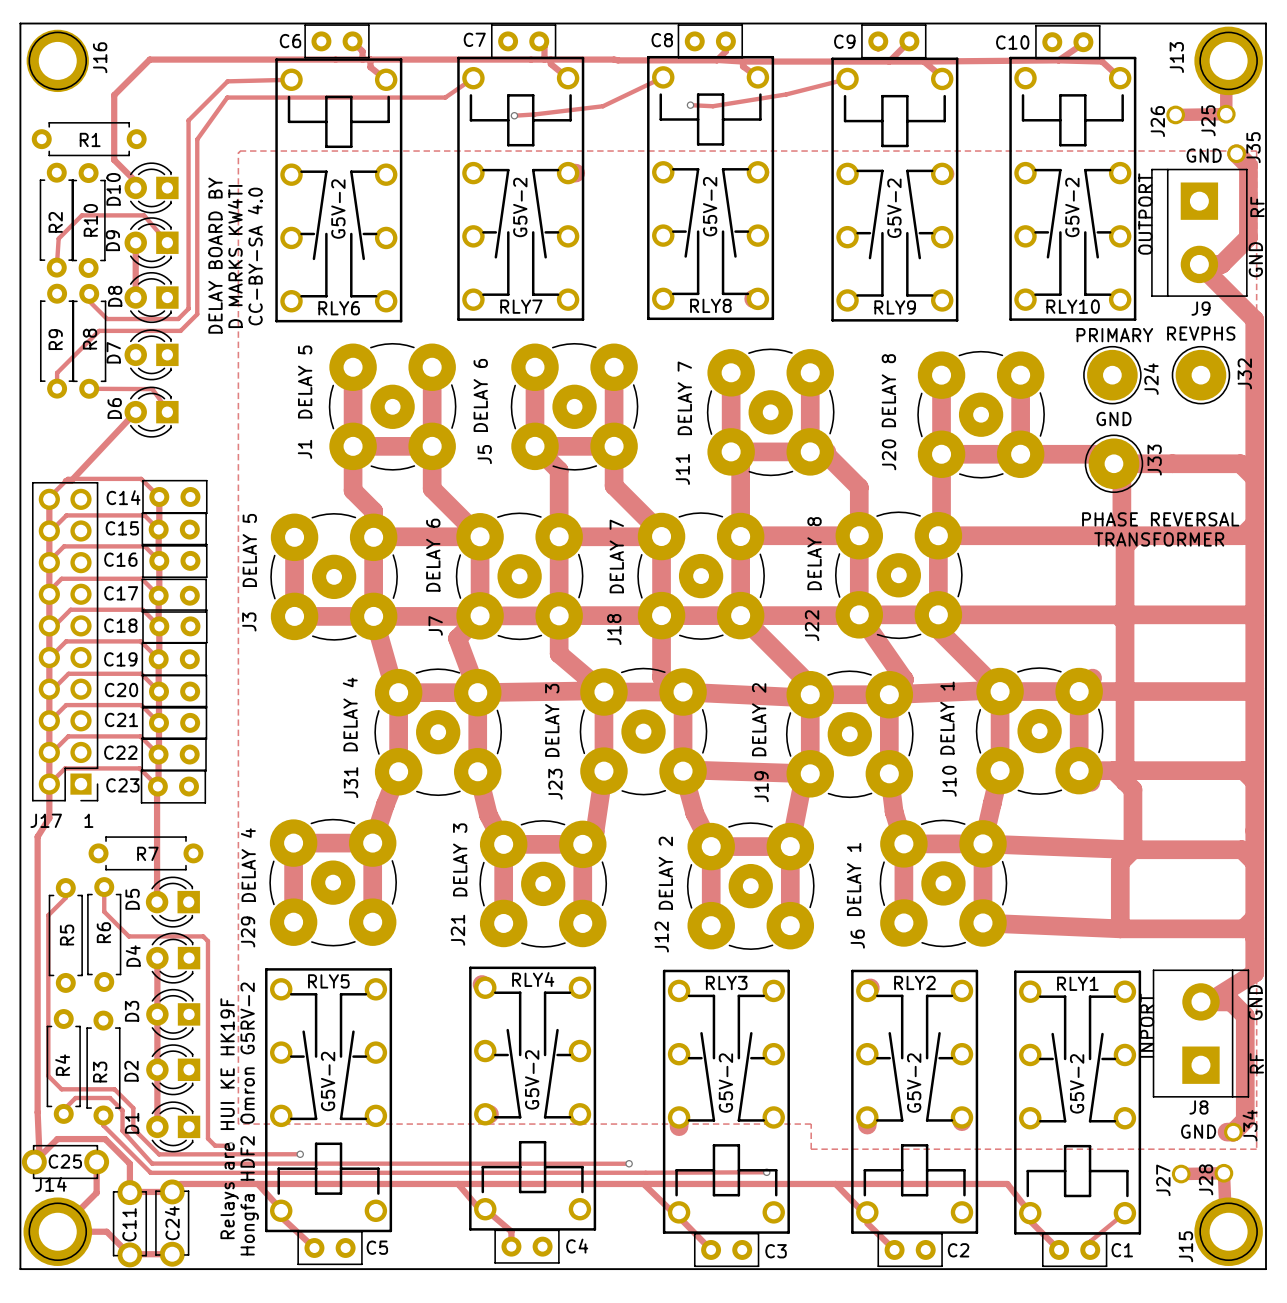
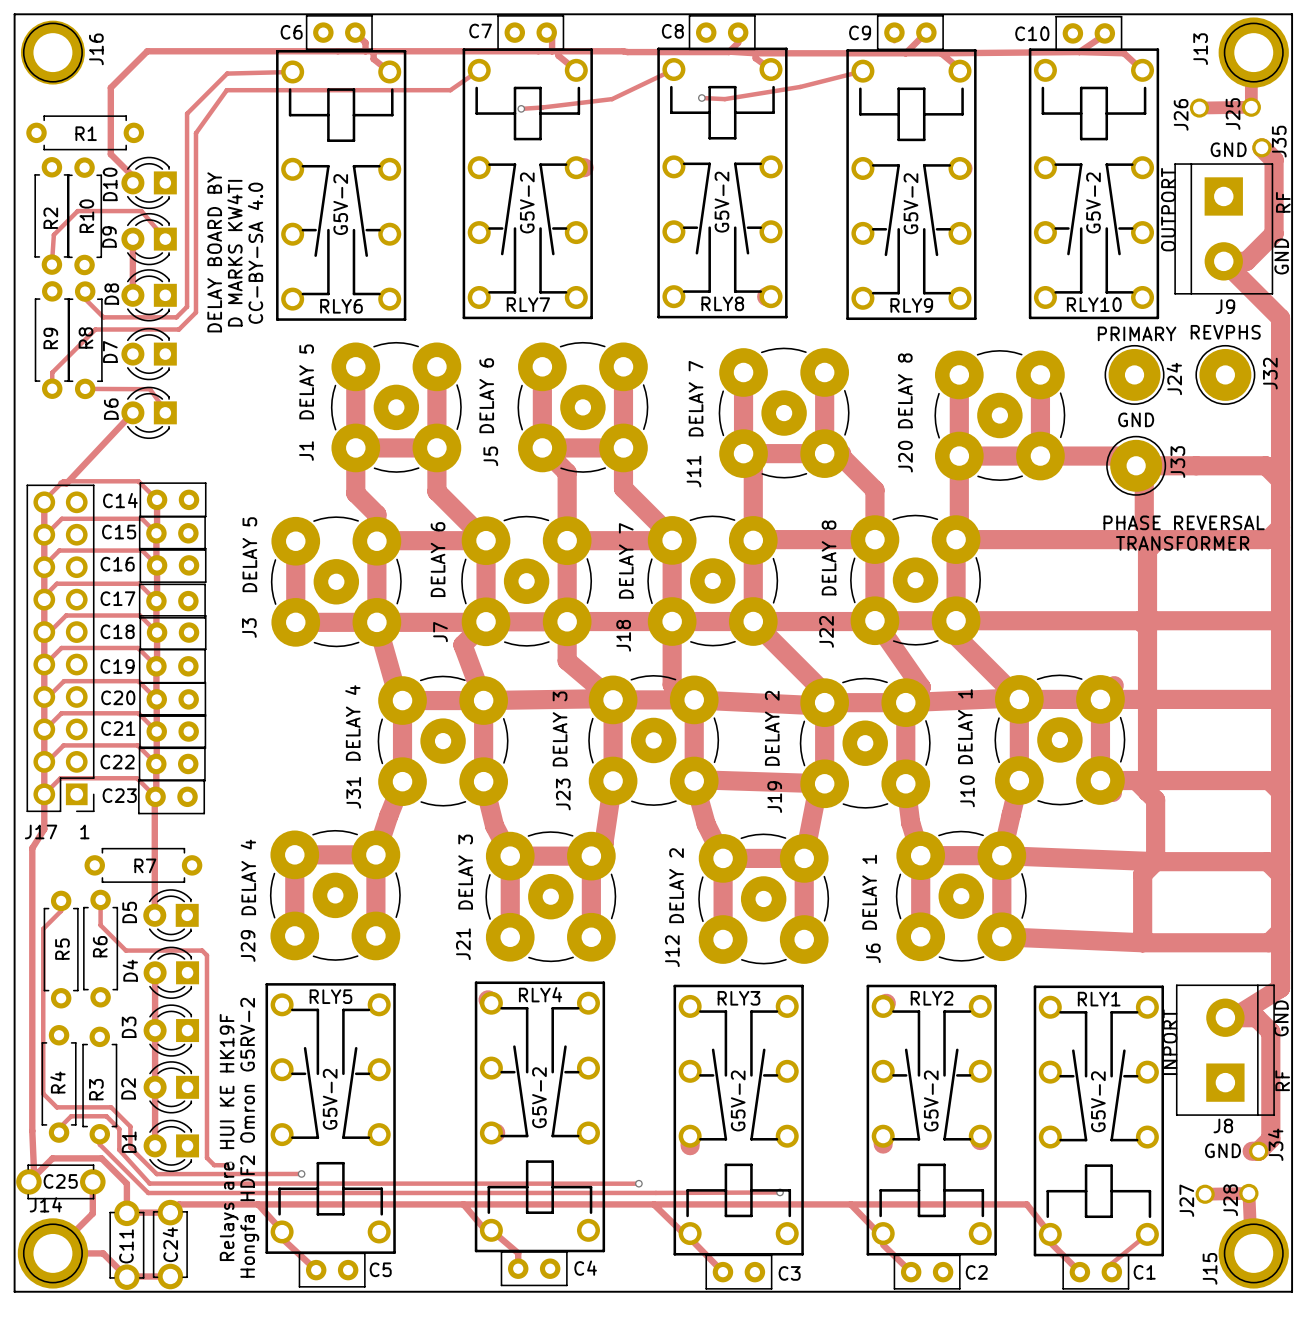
zone outline: (239, 151) (1256, 151) (1256, 1149) (811, 1149) (811, 1124) (238, 1124) (239, 151) -> none

